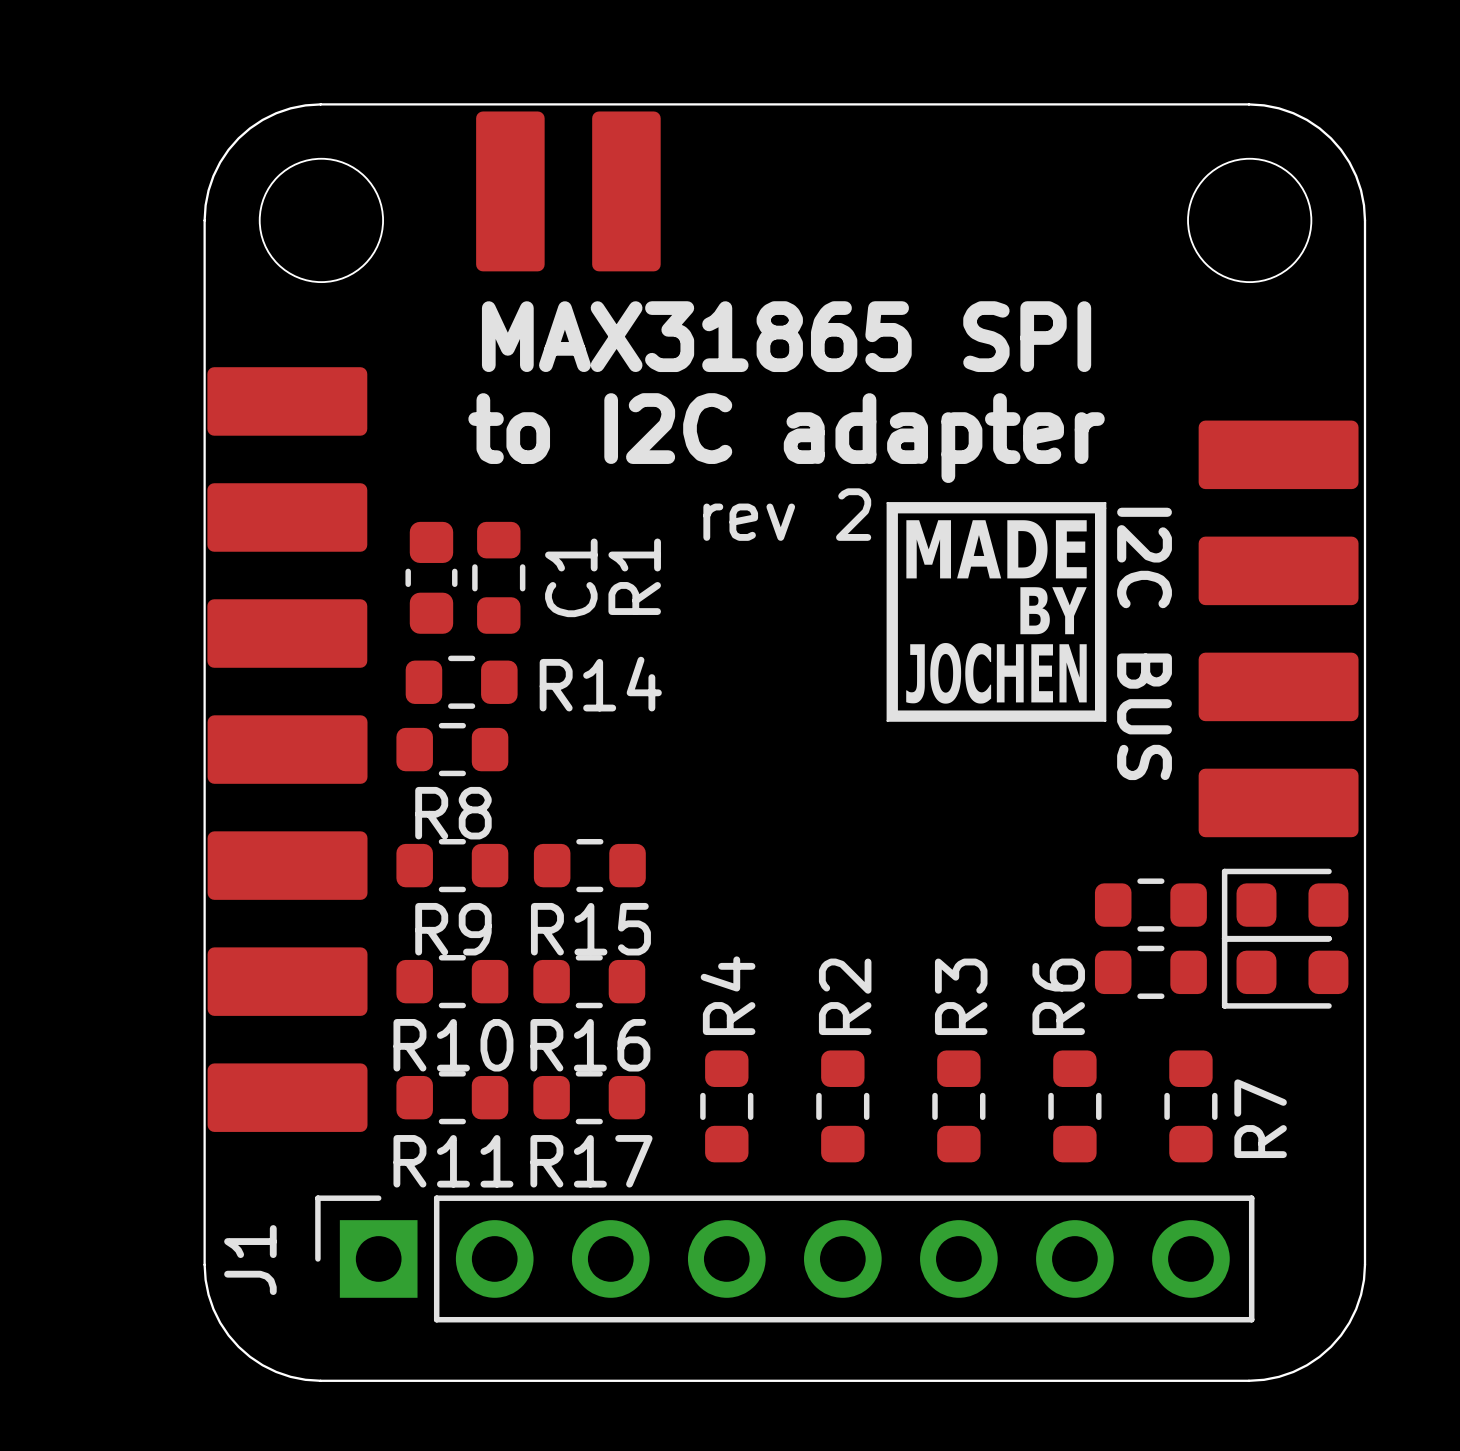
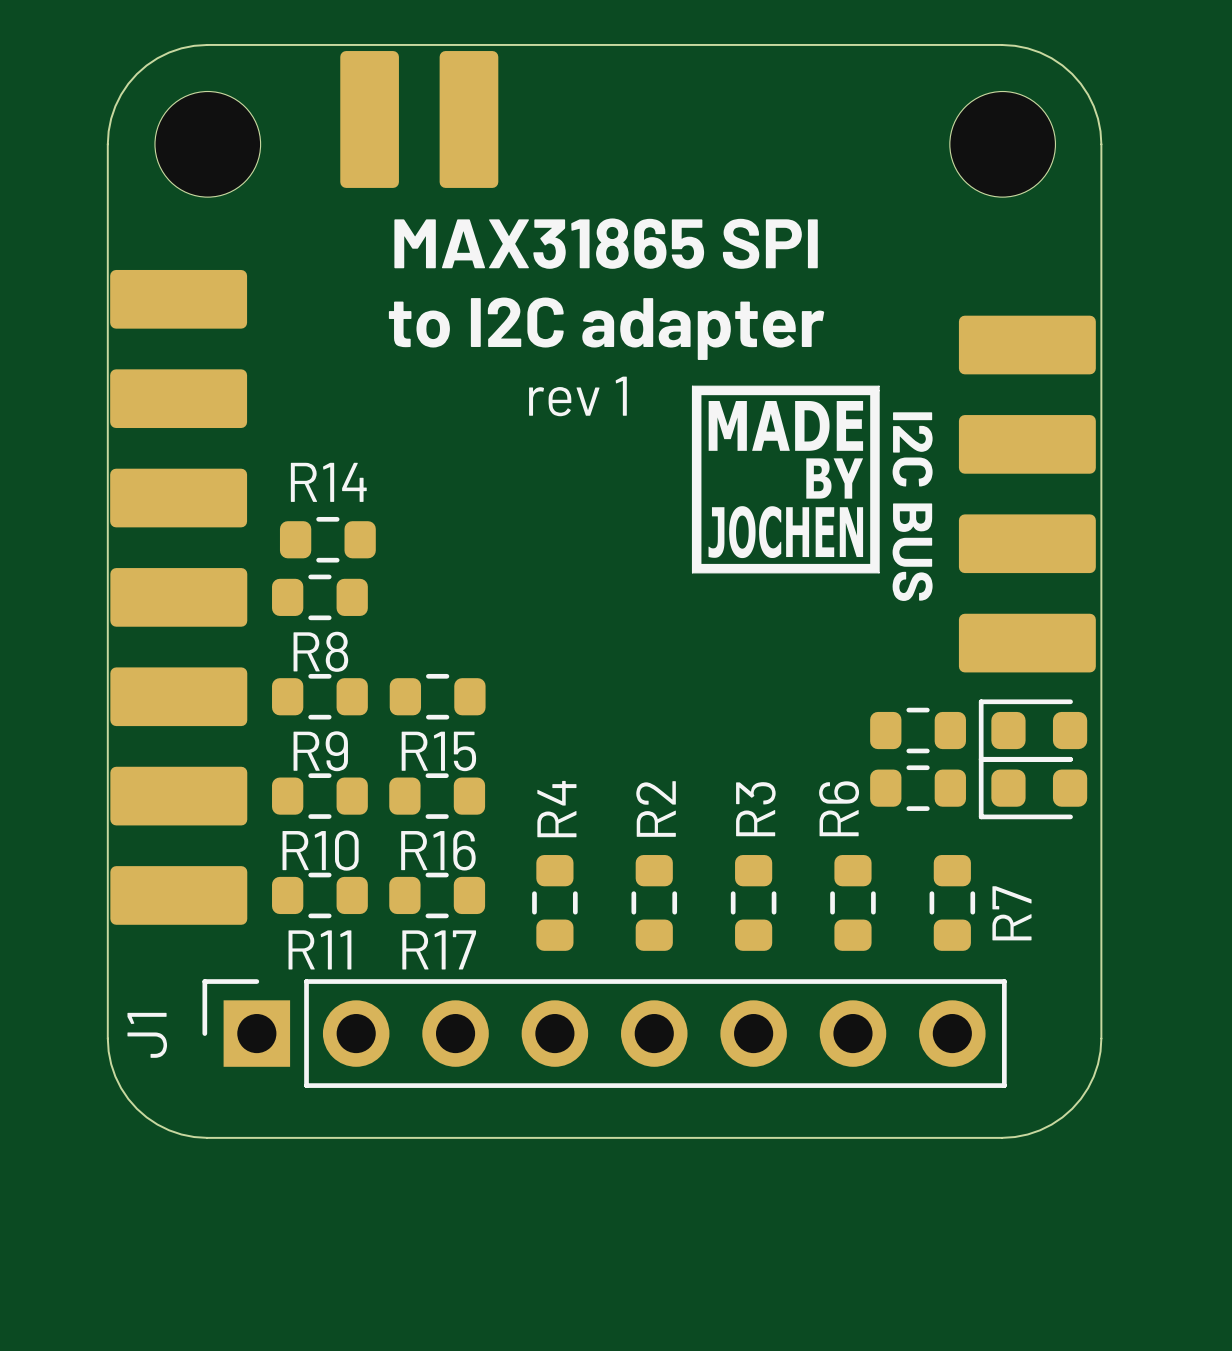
text: rev 2 (787, 514) -> rev 1 (577, 396)
C1: (431, 577) -> none
R1: (498, 577) -> none
R14 name position: R14 (600, 684) -> R14 (328, 482)

